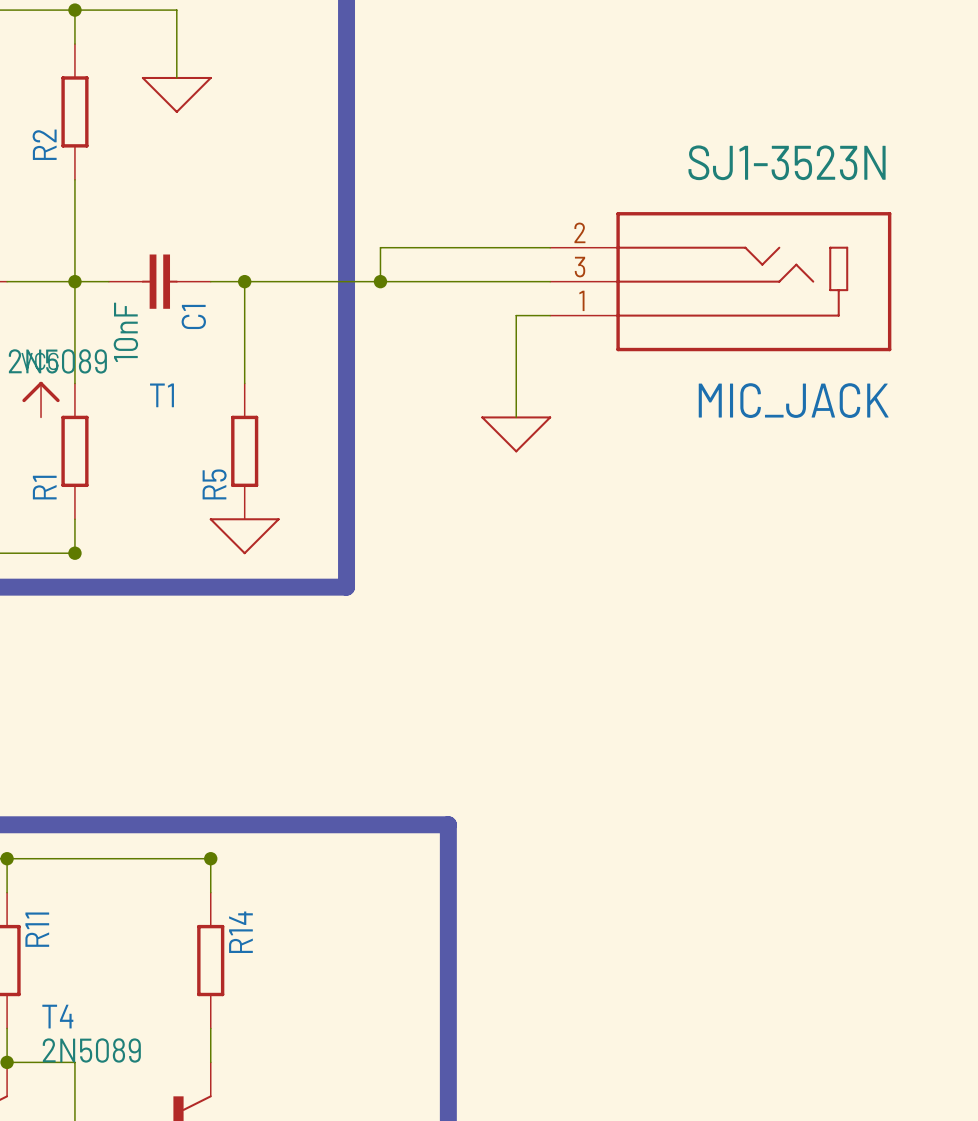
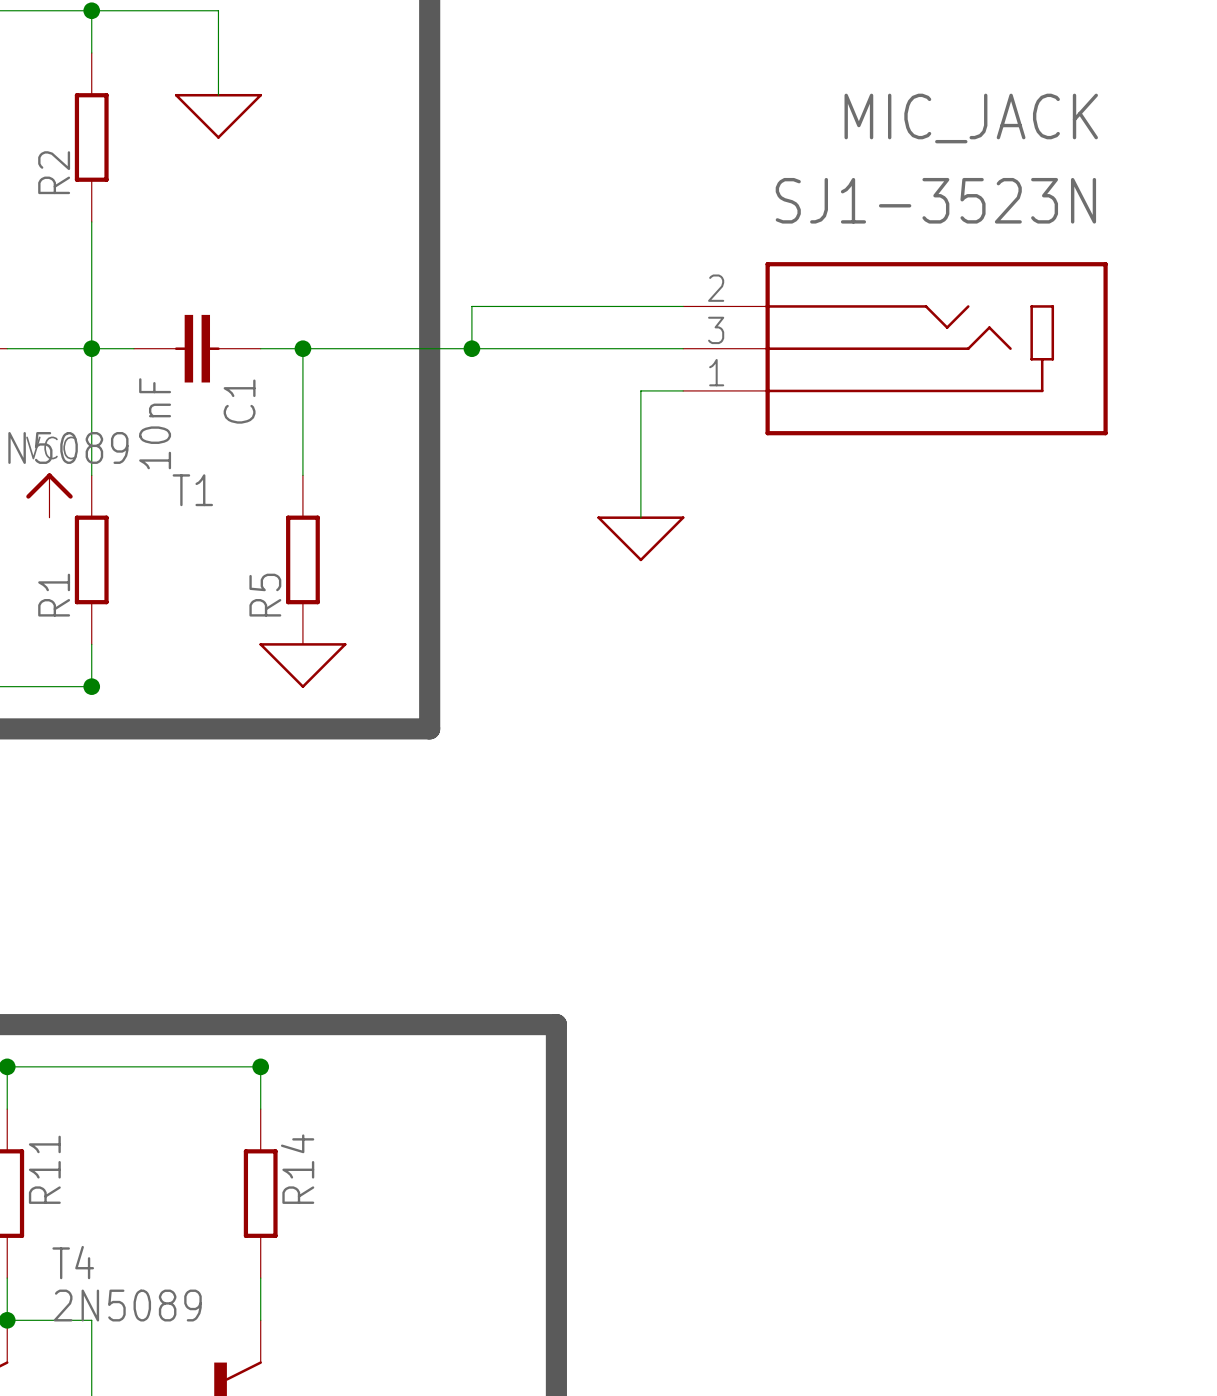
MIC_JACK name position: MIC_JACK (793, 400) -> MIC_JACK (971, 118)

